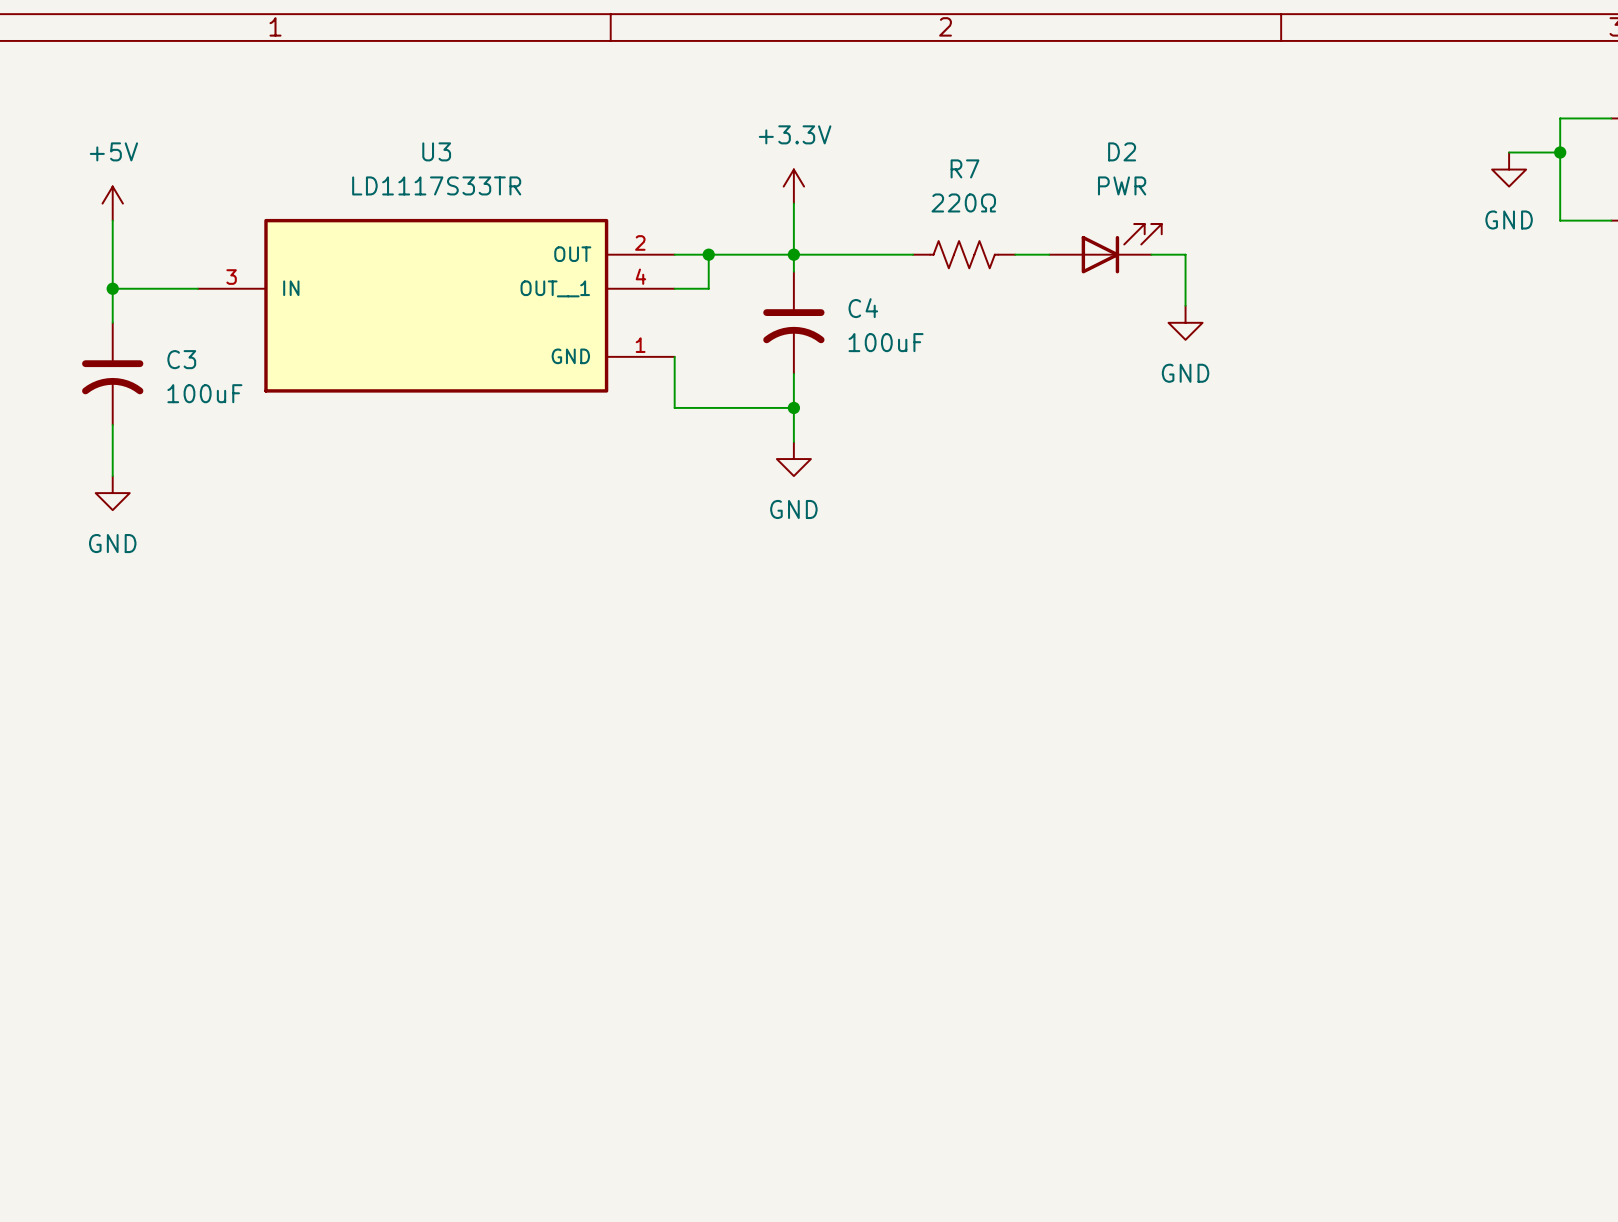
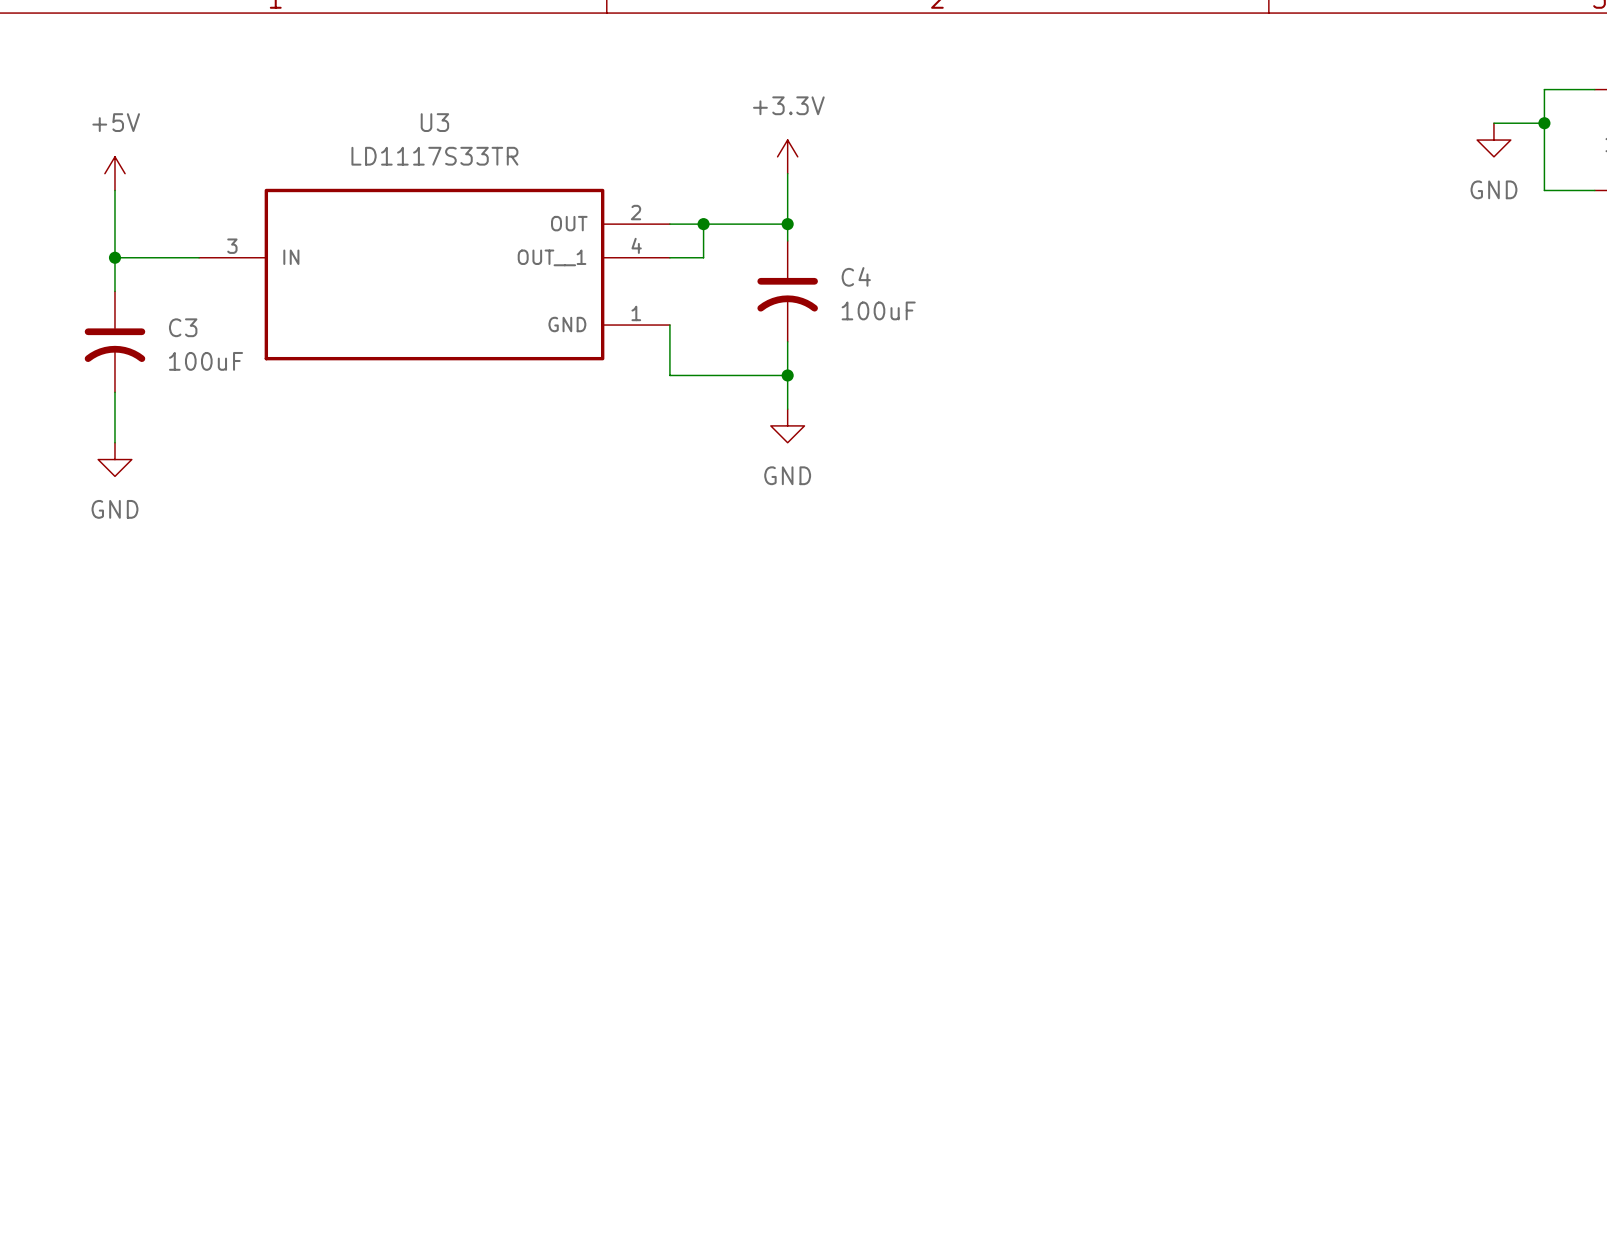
D2: PWR (1105, 248) -> none
wire: (793, 254) (913, 254) -> none
R7: 220Ω (964, 254) -> none
wire: (1015, 254) (1049, 254) -> none
wire: (1151, 254) (1185, 254) (1185, 305) -> none
power symbol: GND (1185, 322) -> none

